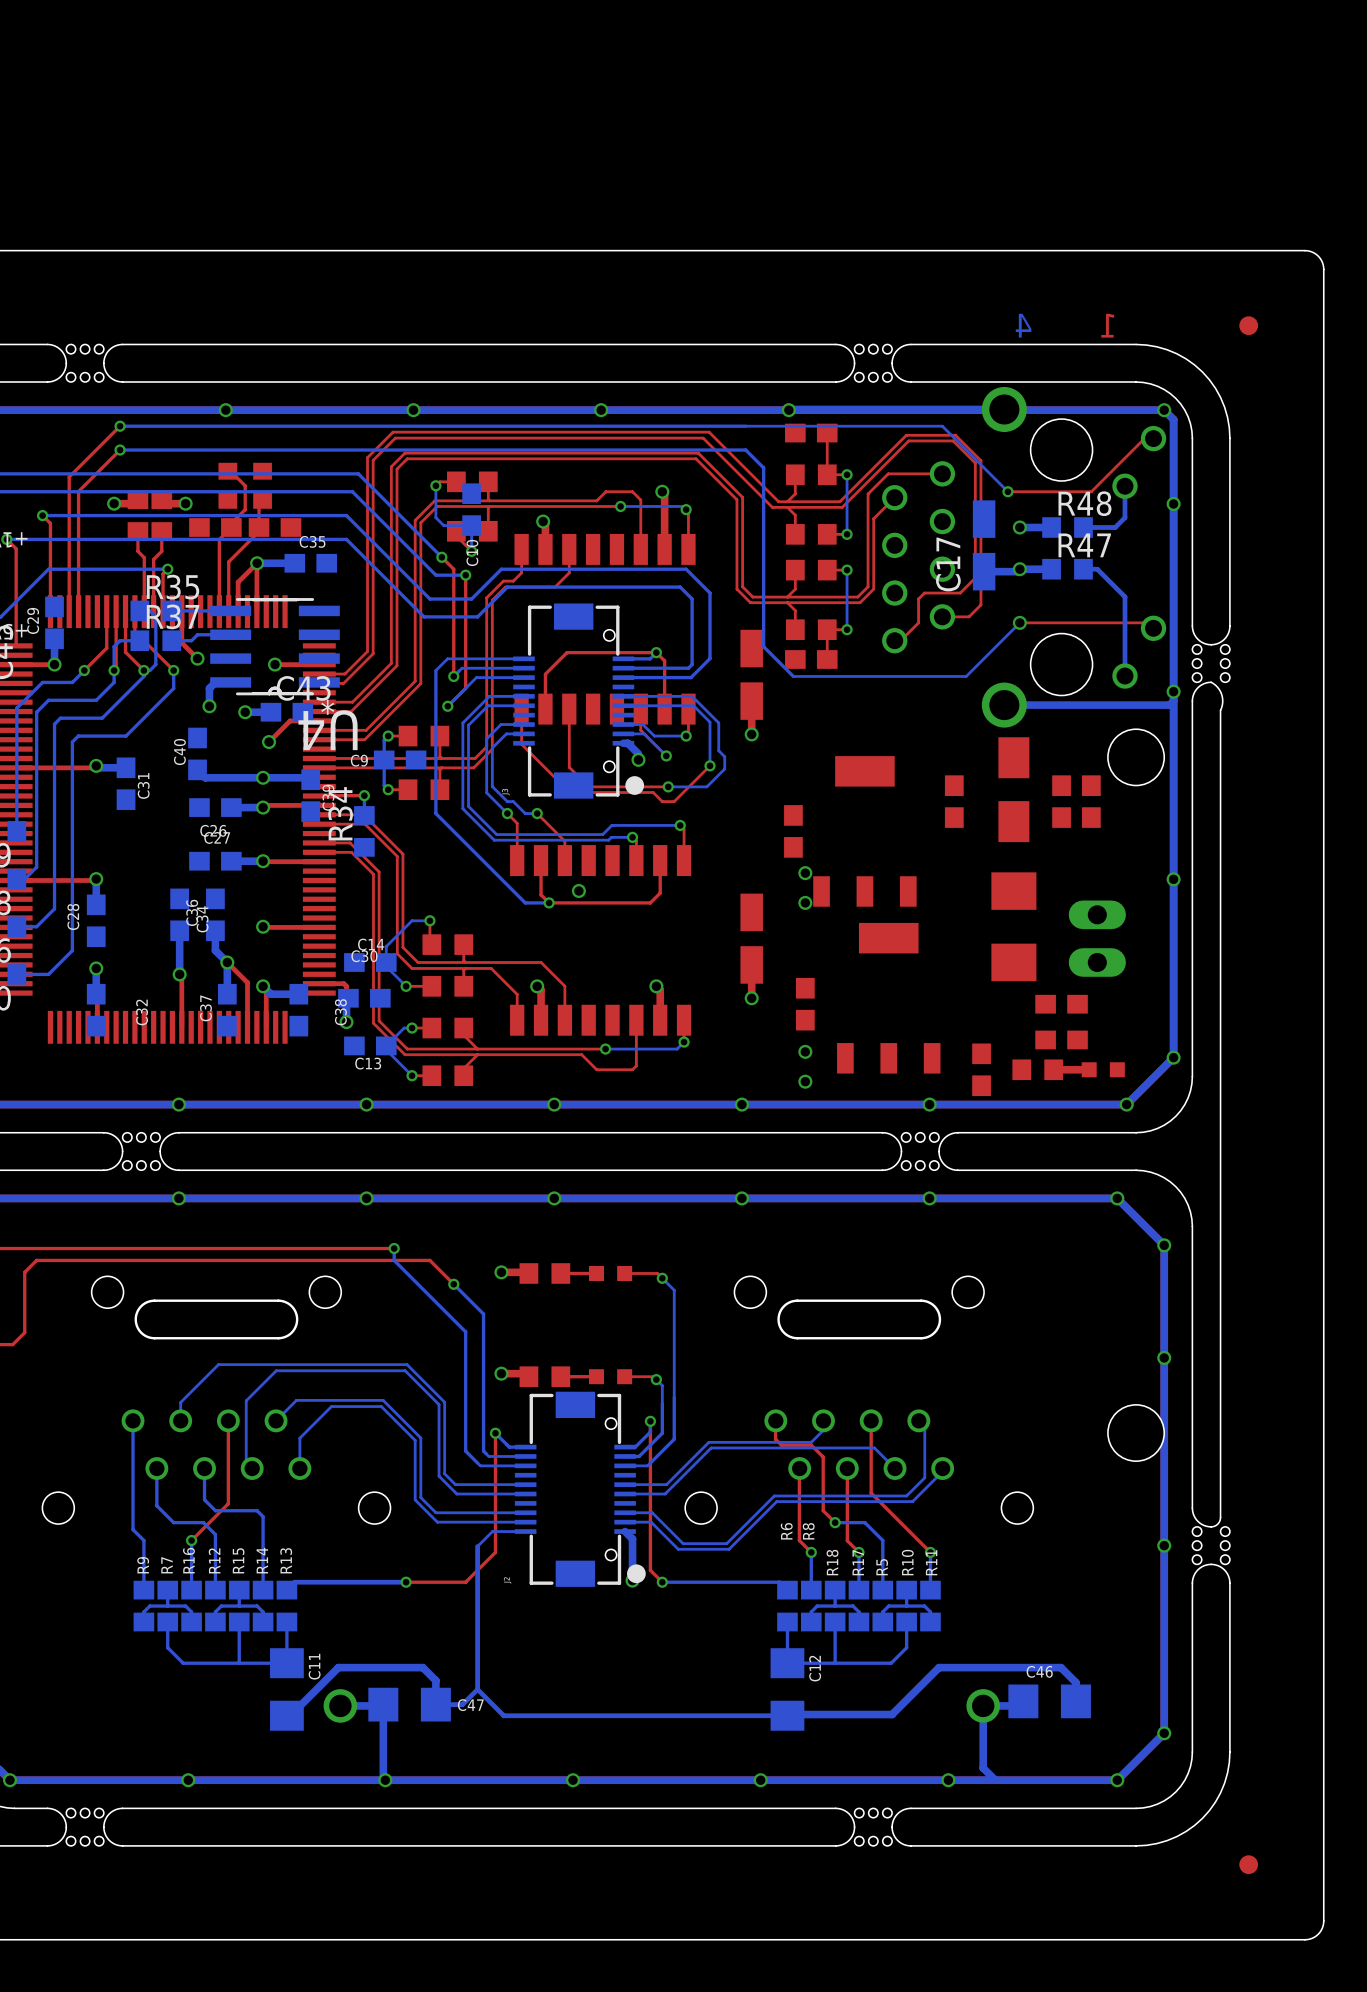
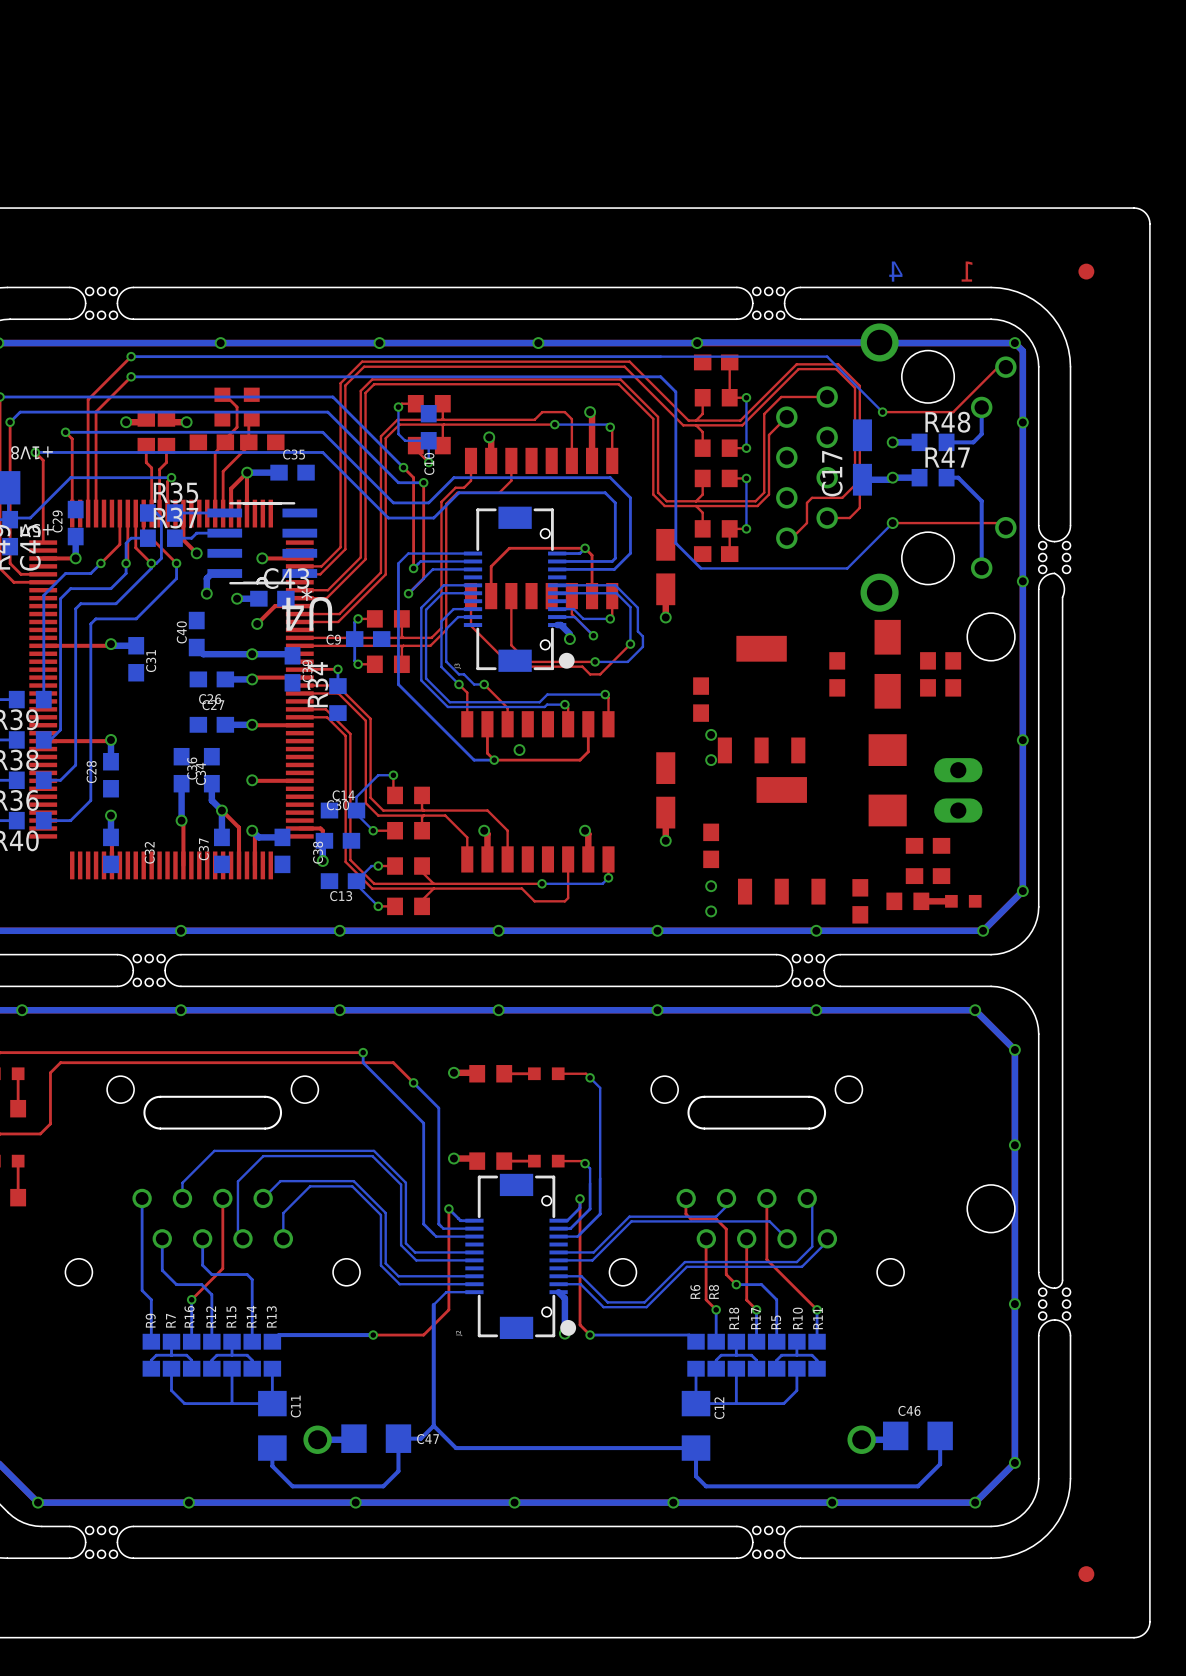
bottom track: (1173, 701) (1169, 705) (1004, 705) -> none
bottom track: (1075, 1701) (1075, 1682) (1061, 1667) (939, 1667) (892, 1714) (787, 1715) -> (940, 1435) (940, 1464) (917, 1486) (706, 1486) (696, 1476) (696, 1448)
bottom track: (383, 1704) (383, 1778) (385, 1780) -> none
bottom track: (435, 1704) (435, 1680) (422, 1667) (338, 1667) (290, 1715) (286, 1715) -> (398, 1438) (398, 1471) (383, 1486) (292, 1486) (272, 1466) (272, 1448)
bottom track: (983, 1705) (983, 1768) (995, 1780) -> none

